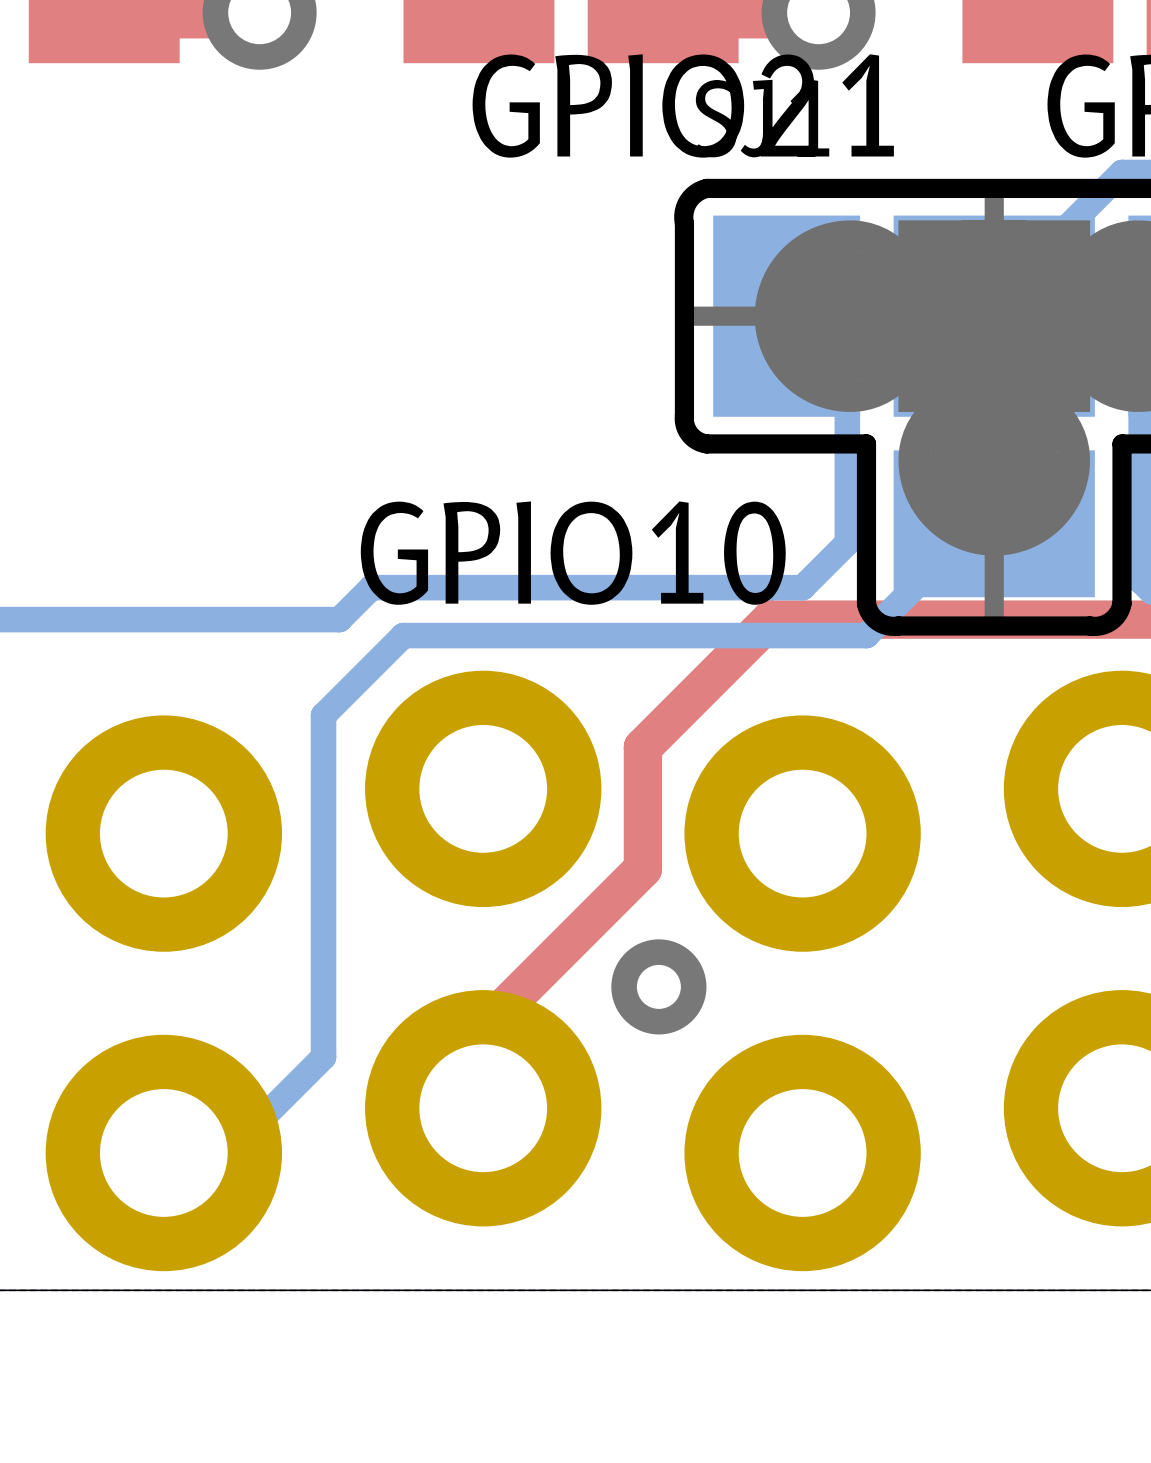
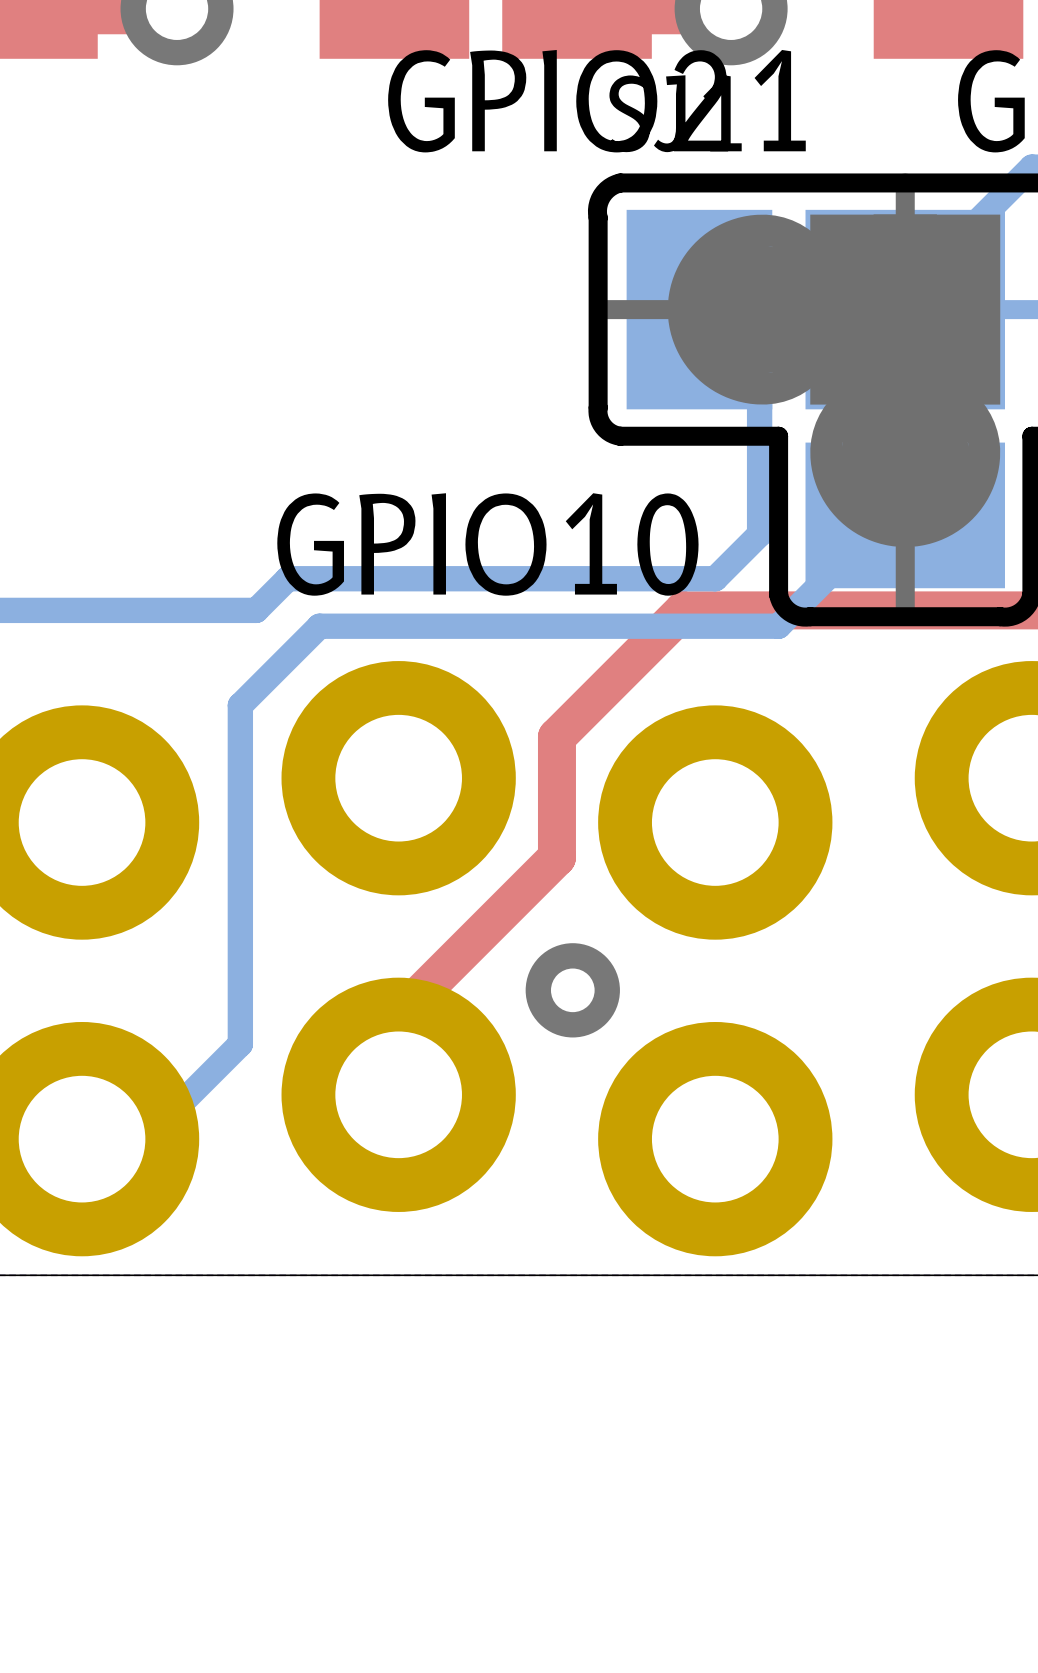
via position: (658, 986) -> (572, 990)

